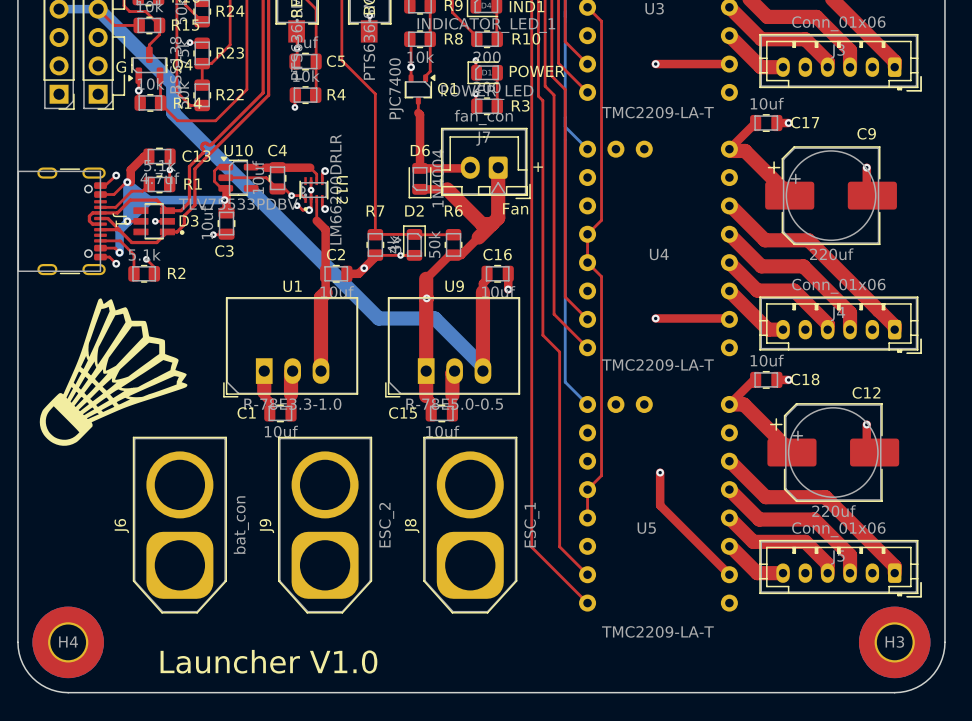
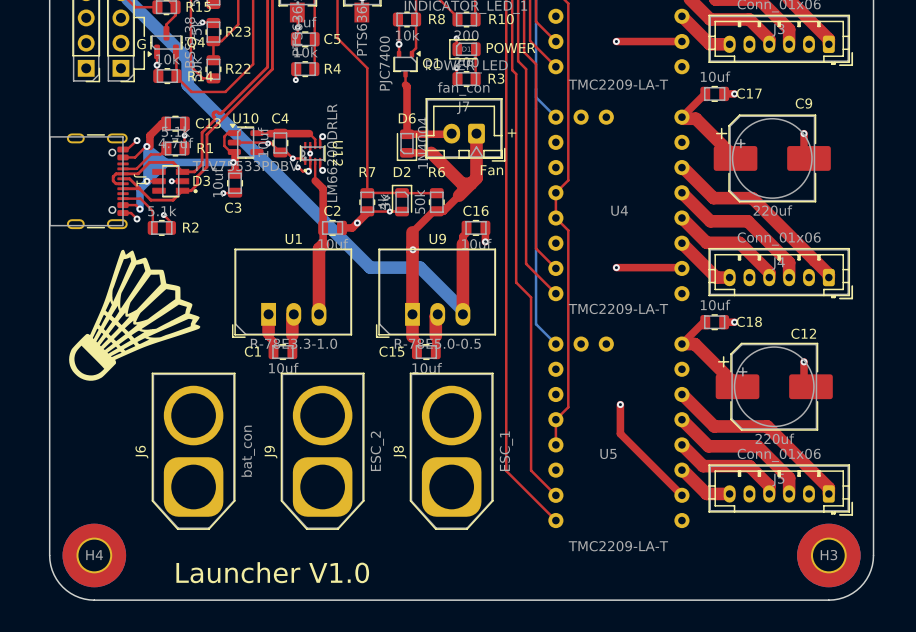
via: none -> (268, 143)

